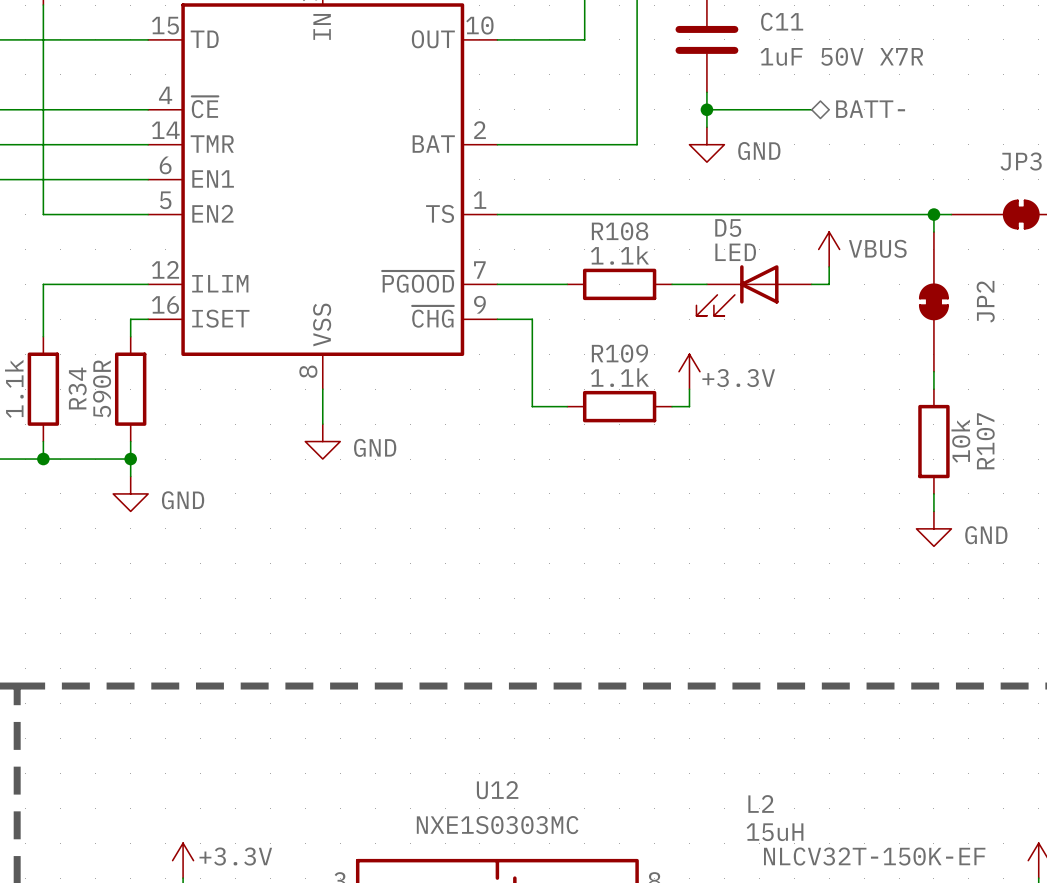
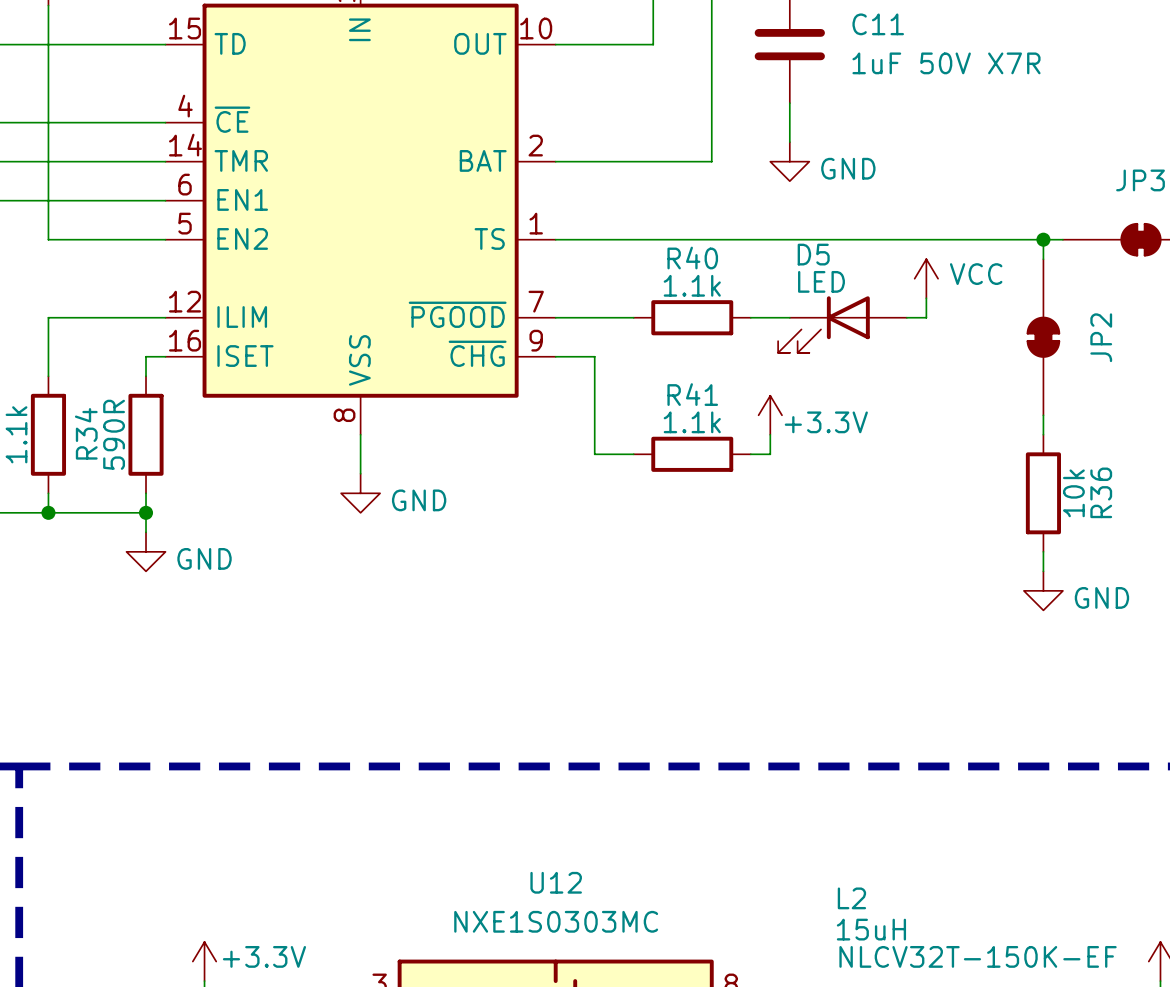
wire: (706, 109) (811, 109) -> none
junction: (706, 109) -> none
hierarchical label: BATT- (870, 109) -> none
R108 name: R108 (620, 231) -> R40 (692, 258)
power symbol: VBUS (829, 249) -> VCC (926, 278)
R109 name: R109 (619, 353) -> R41 (692, 394)
R107 name: R107 (985, 441) -> R36 (1101, 492)

